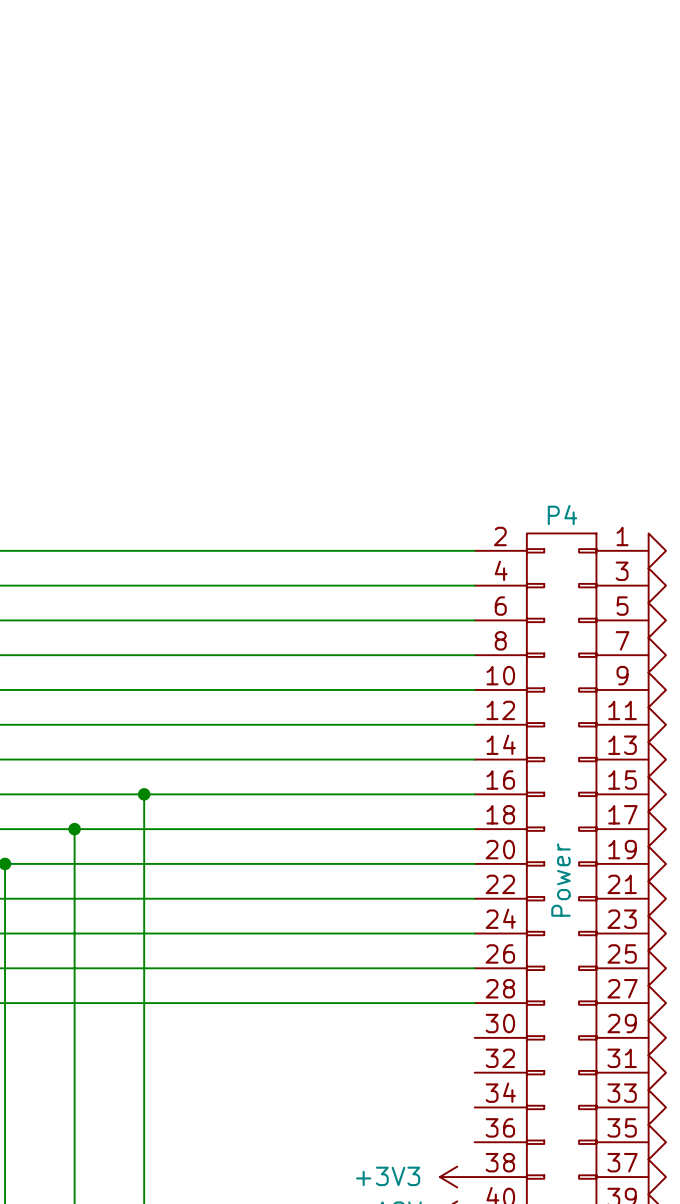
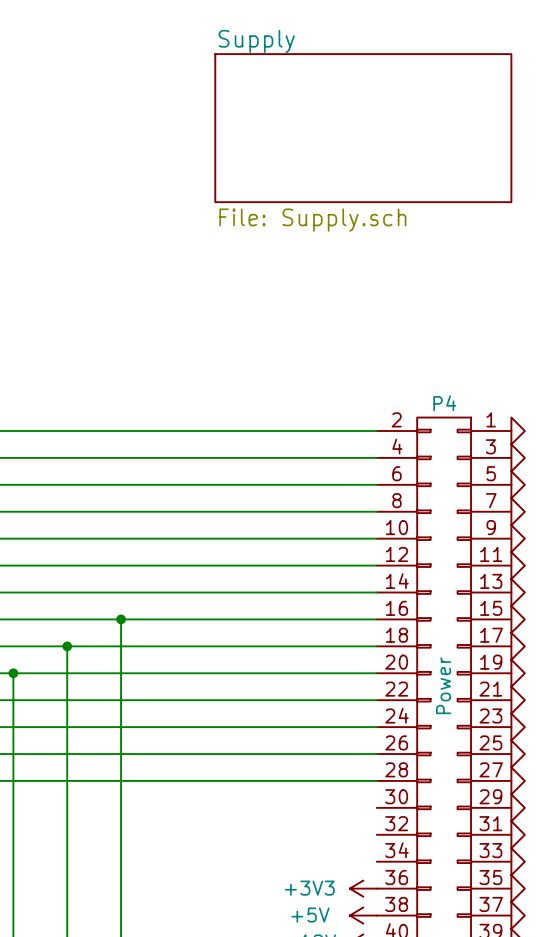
sheet Supply: none -> File: Supply.sch (363, 128)
power symbol: none -> +3V3 (363, 888)
power symbol: +3V3 (457, 1177) -> +5V (363, 915)

